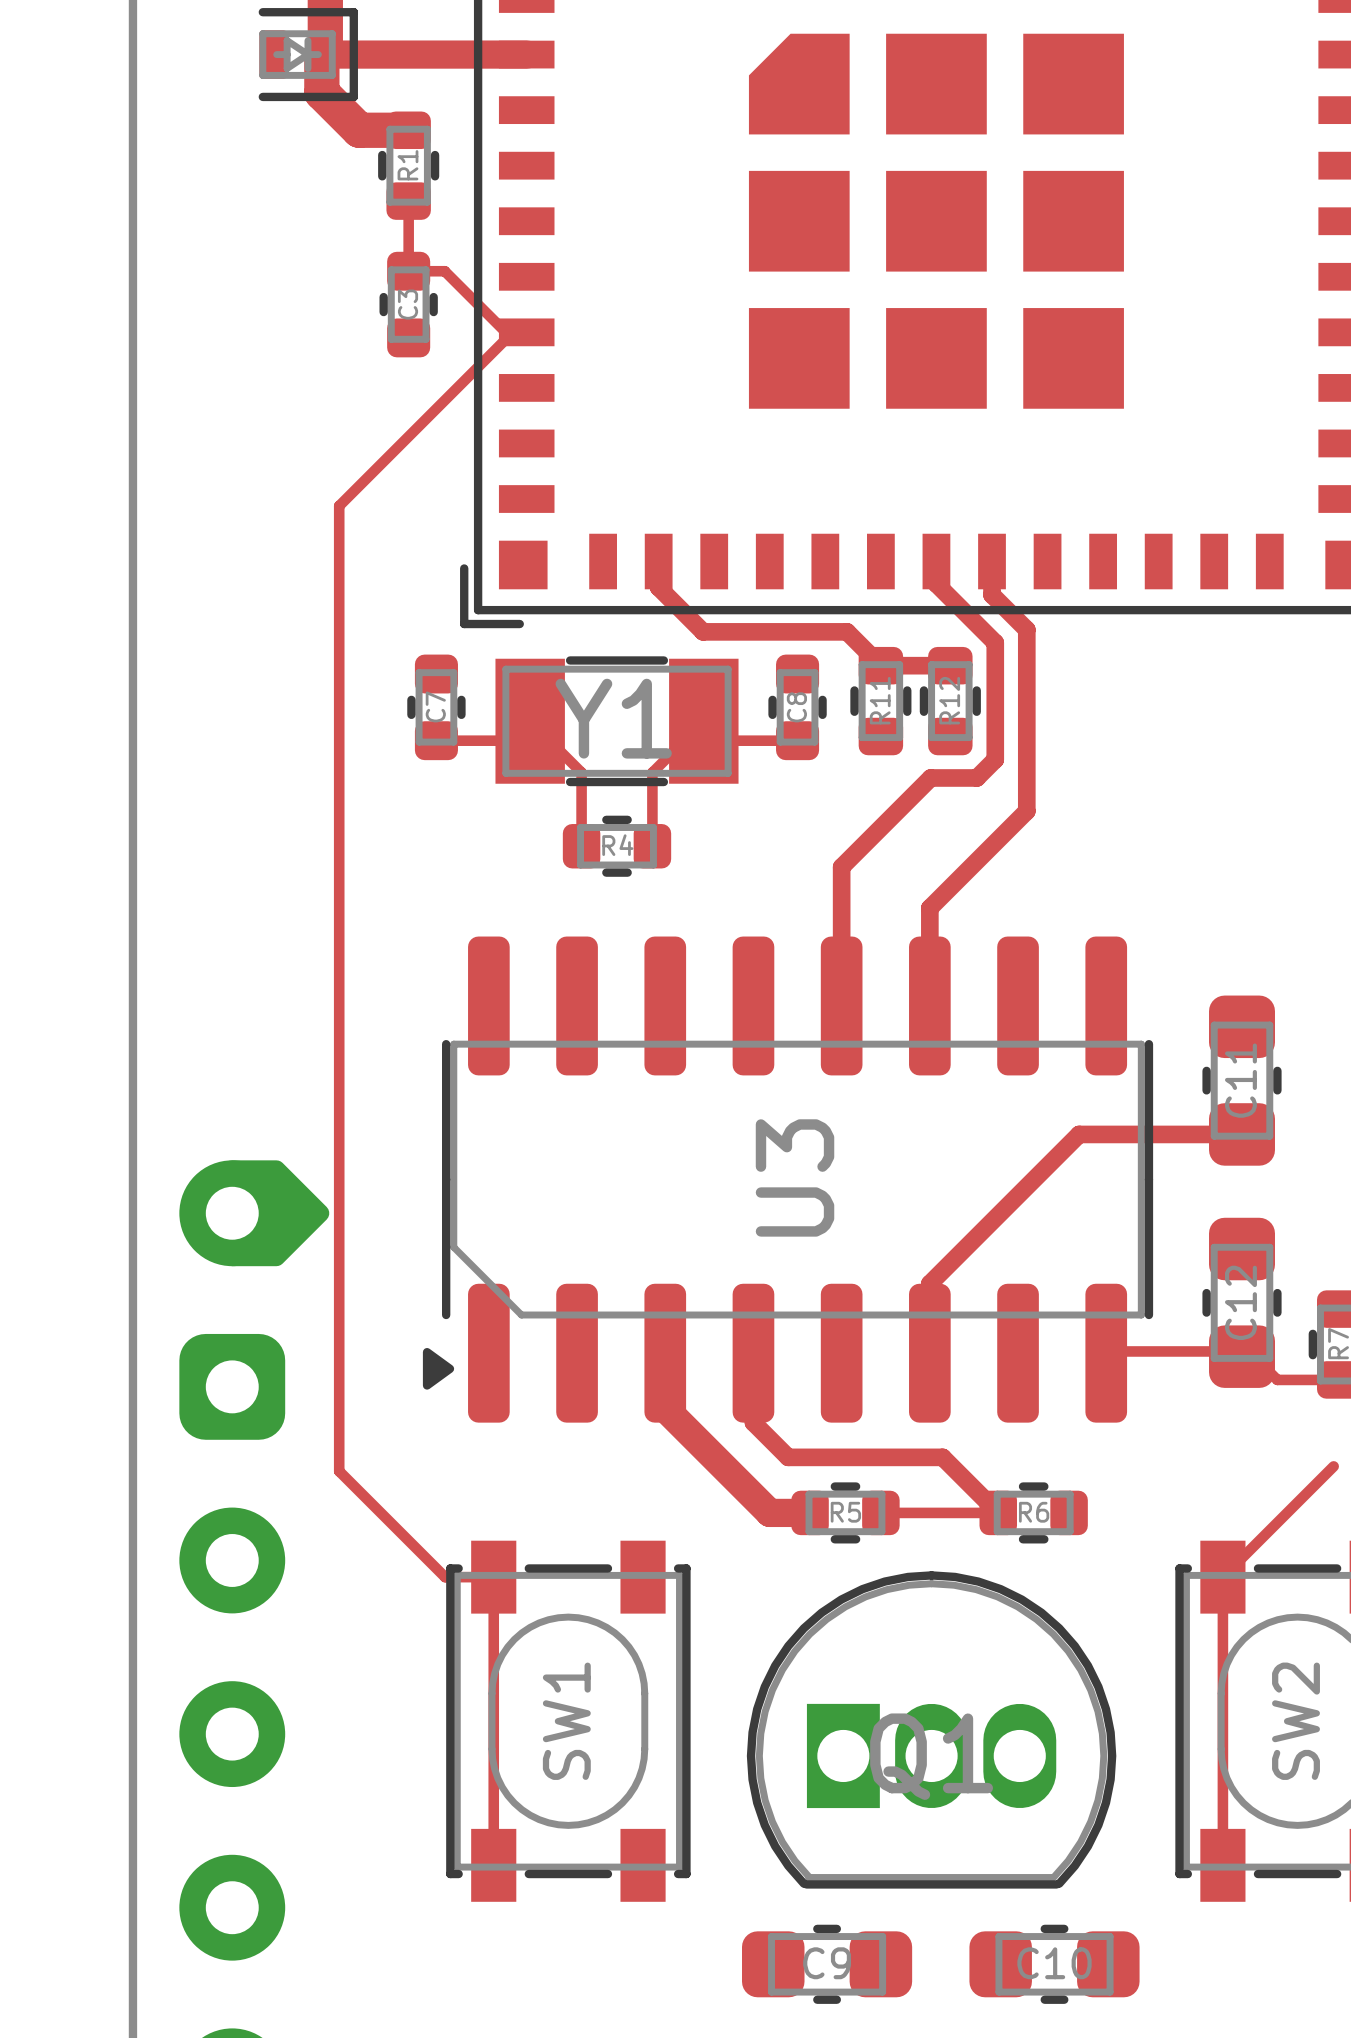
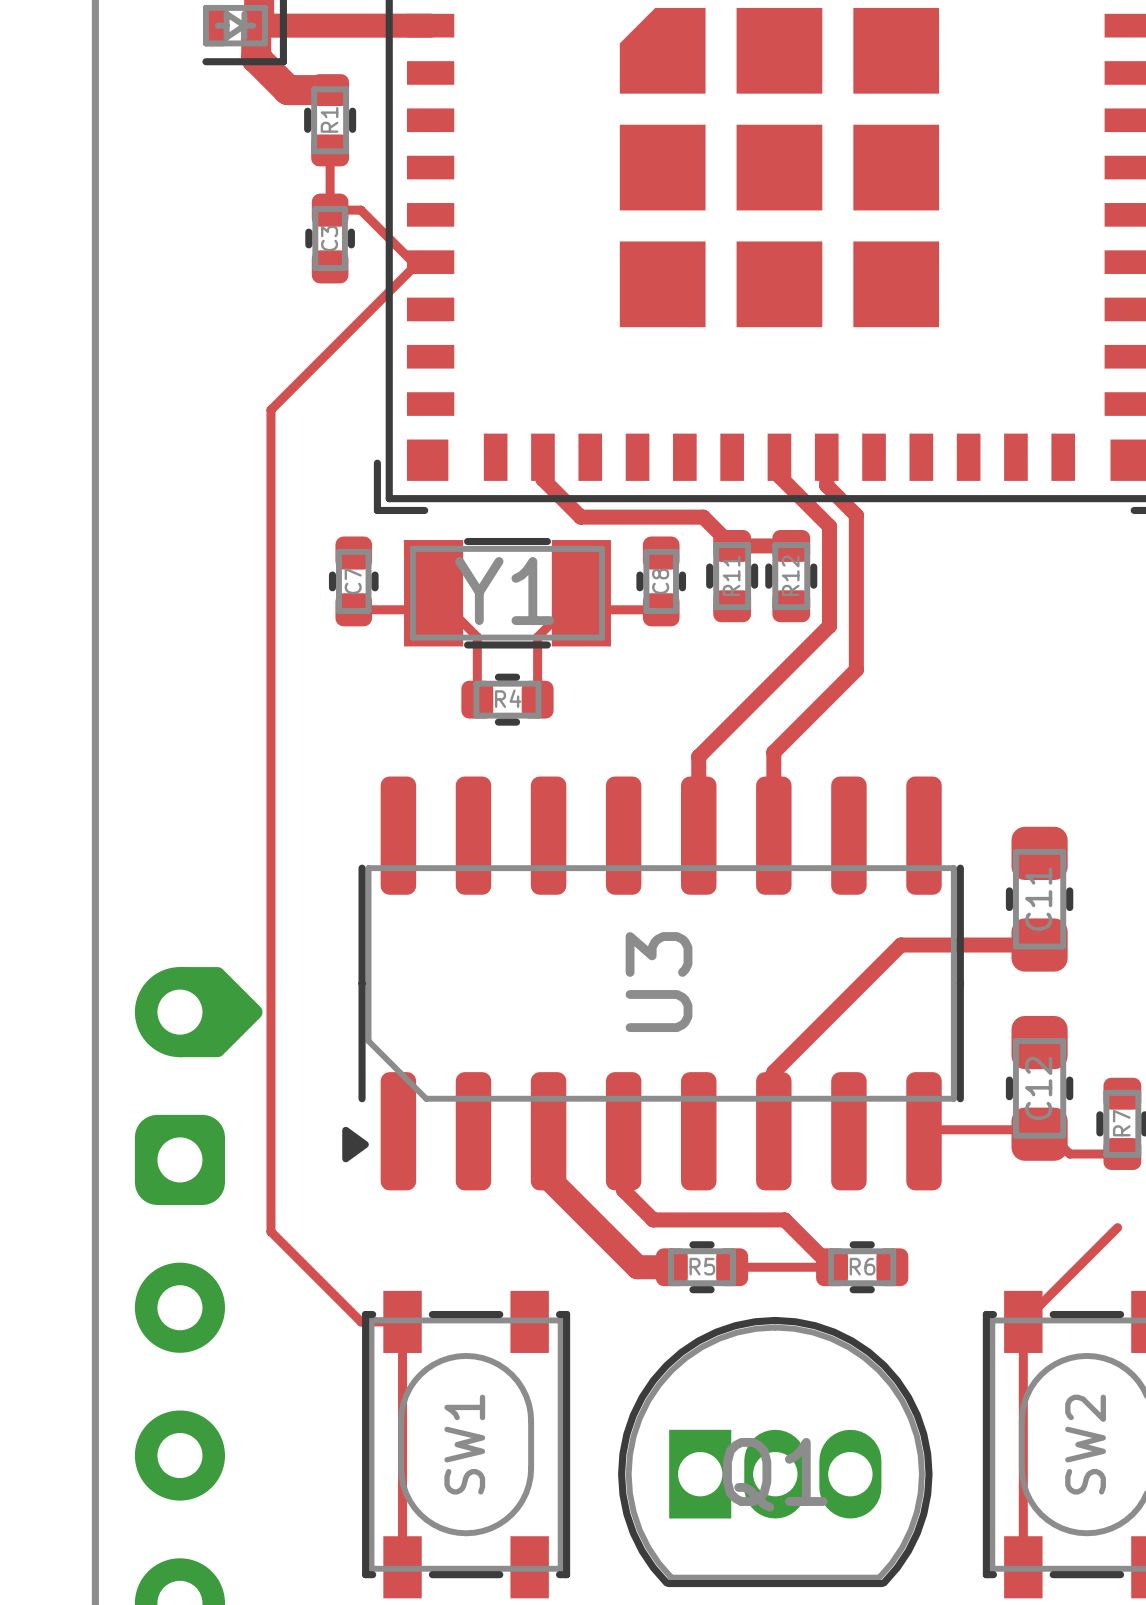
track: (976, 777) (930, 777) (841, 867) (841, 913) -> (813, 641) (698, 756)

